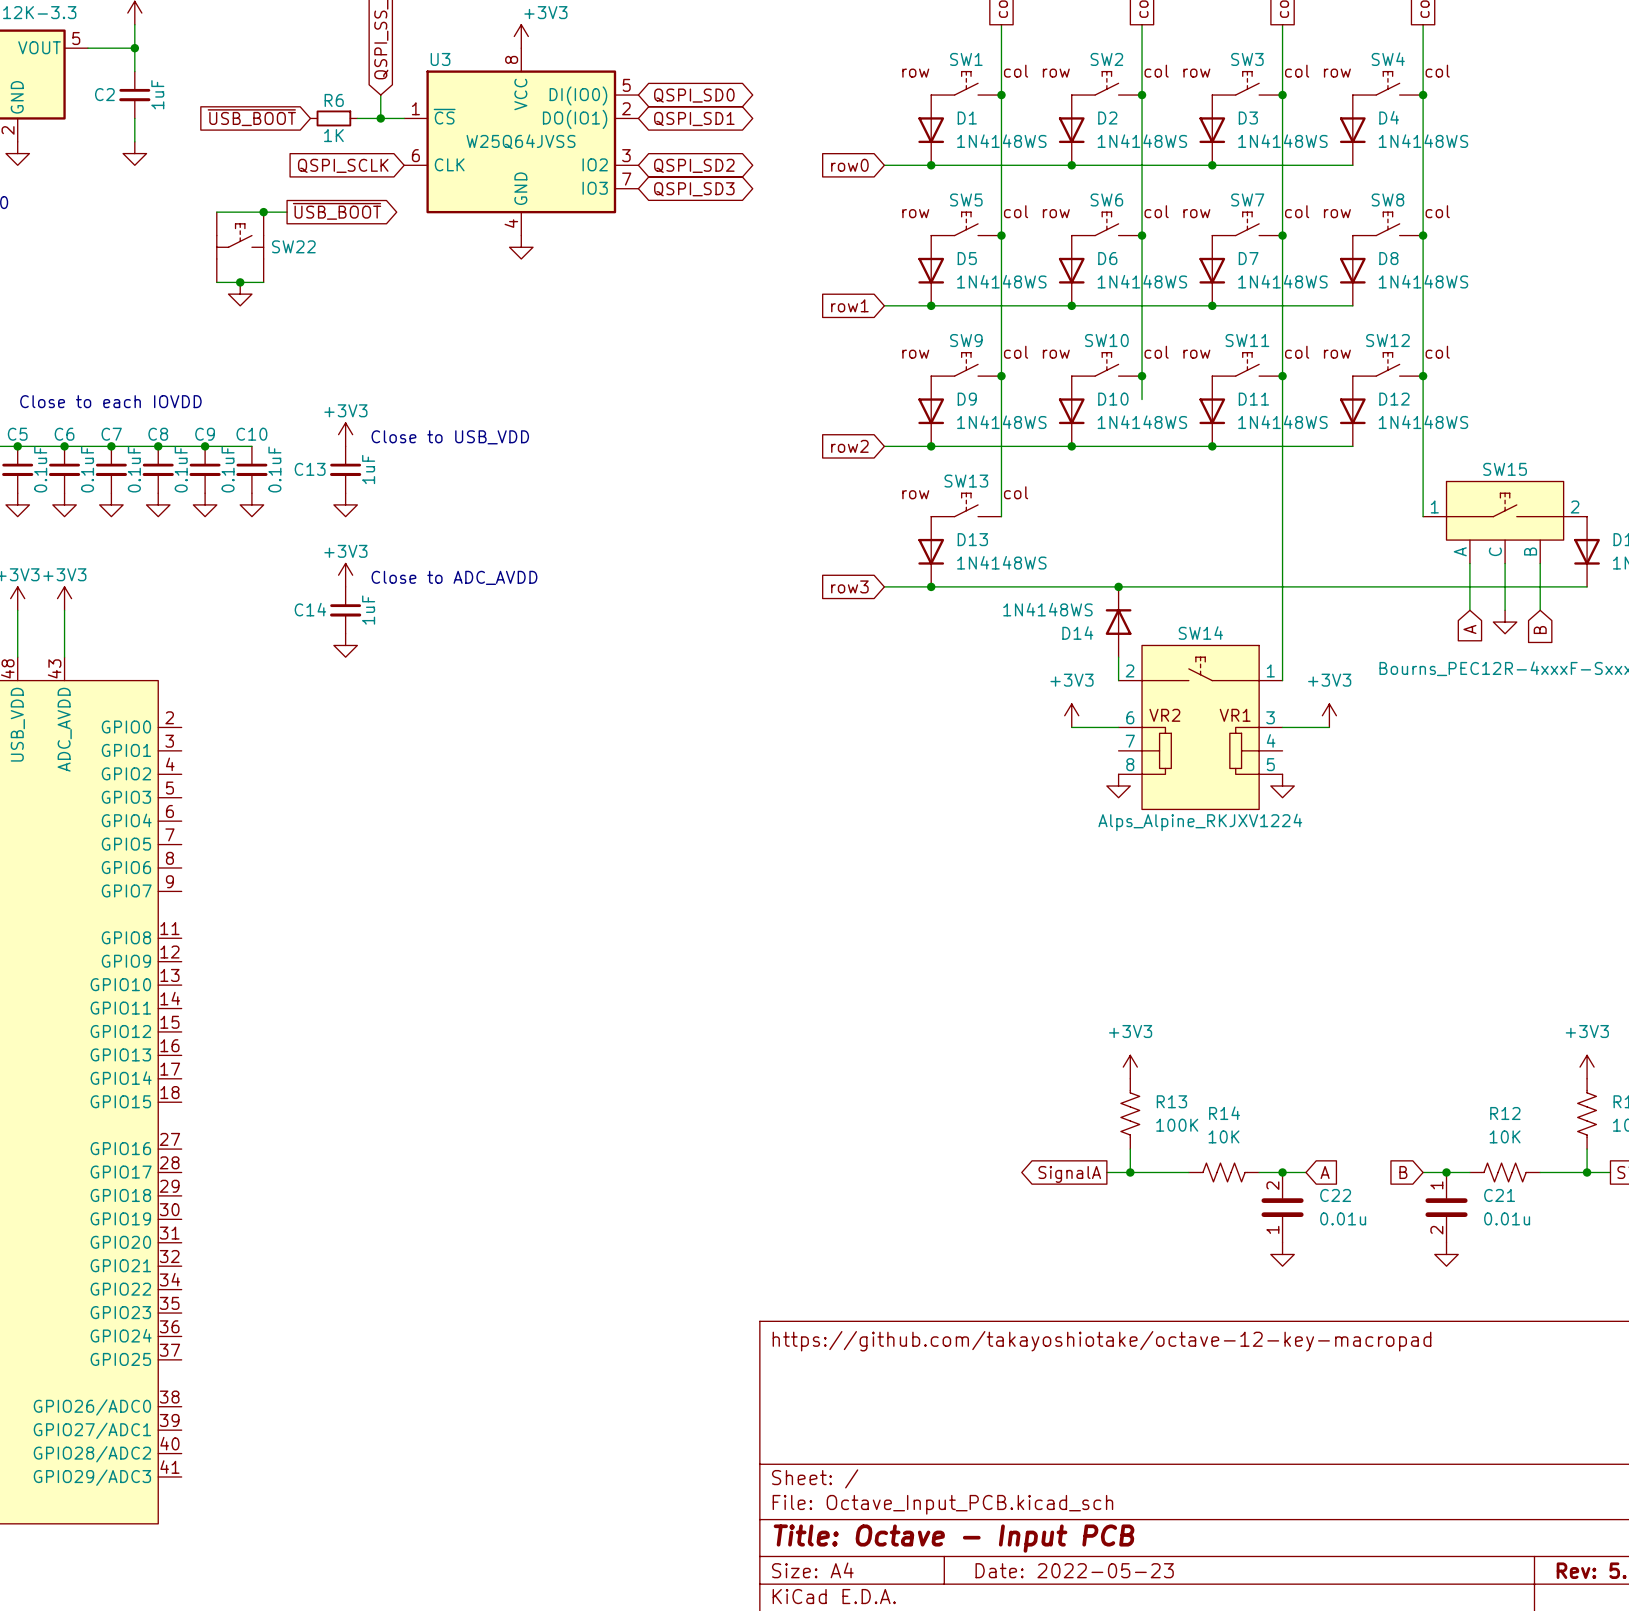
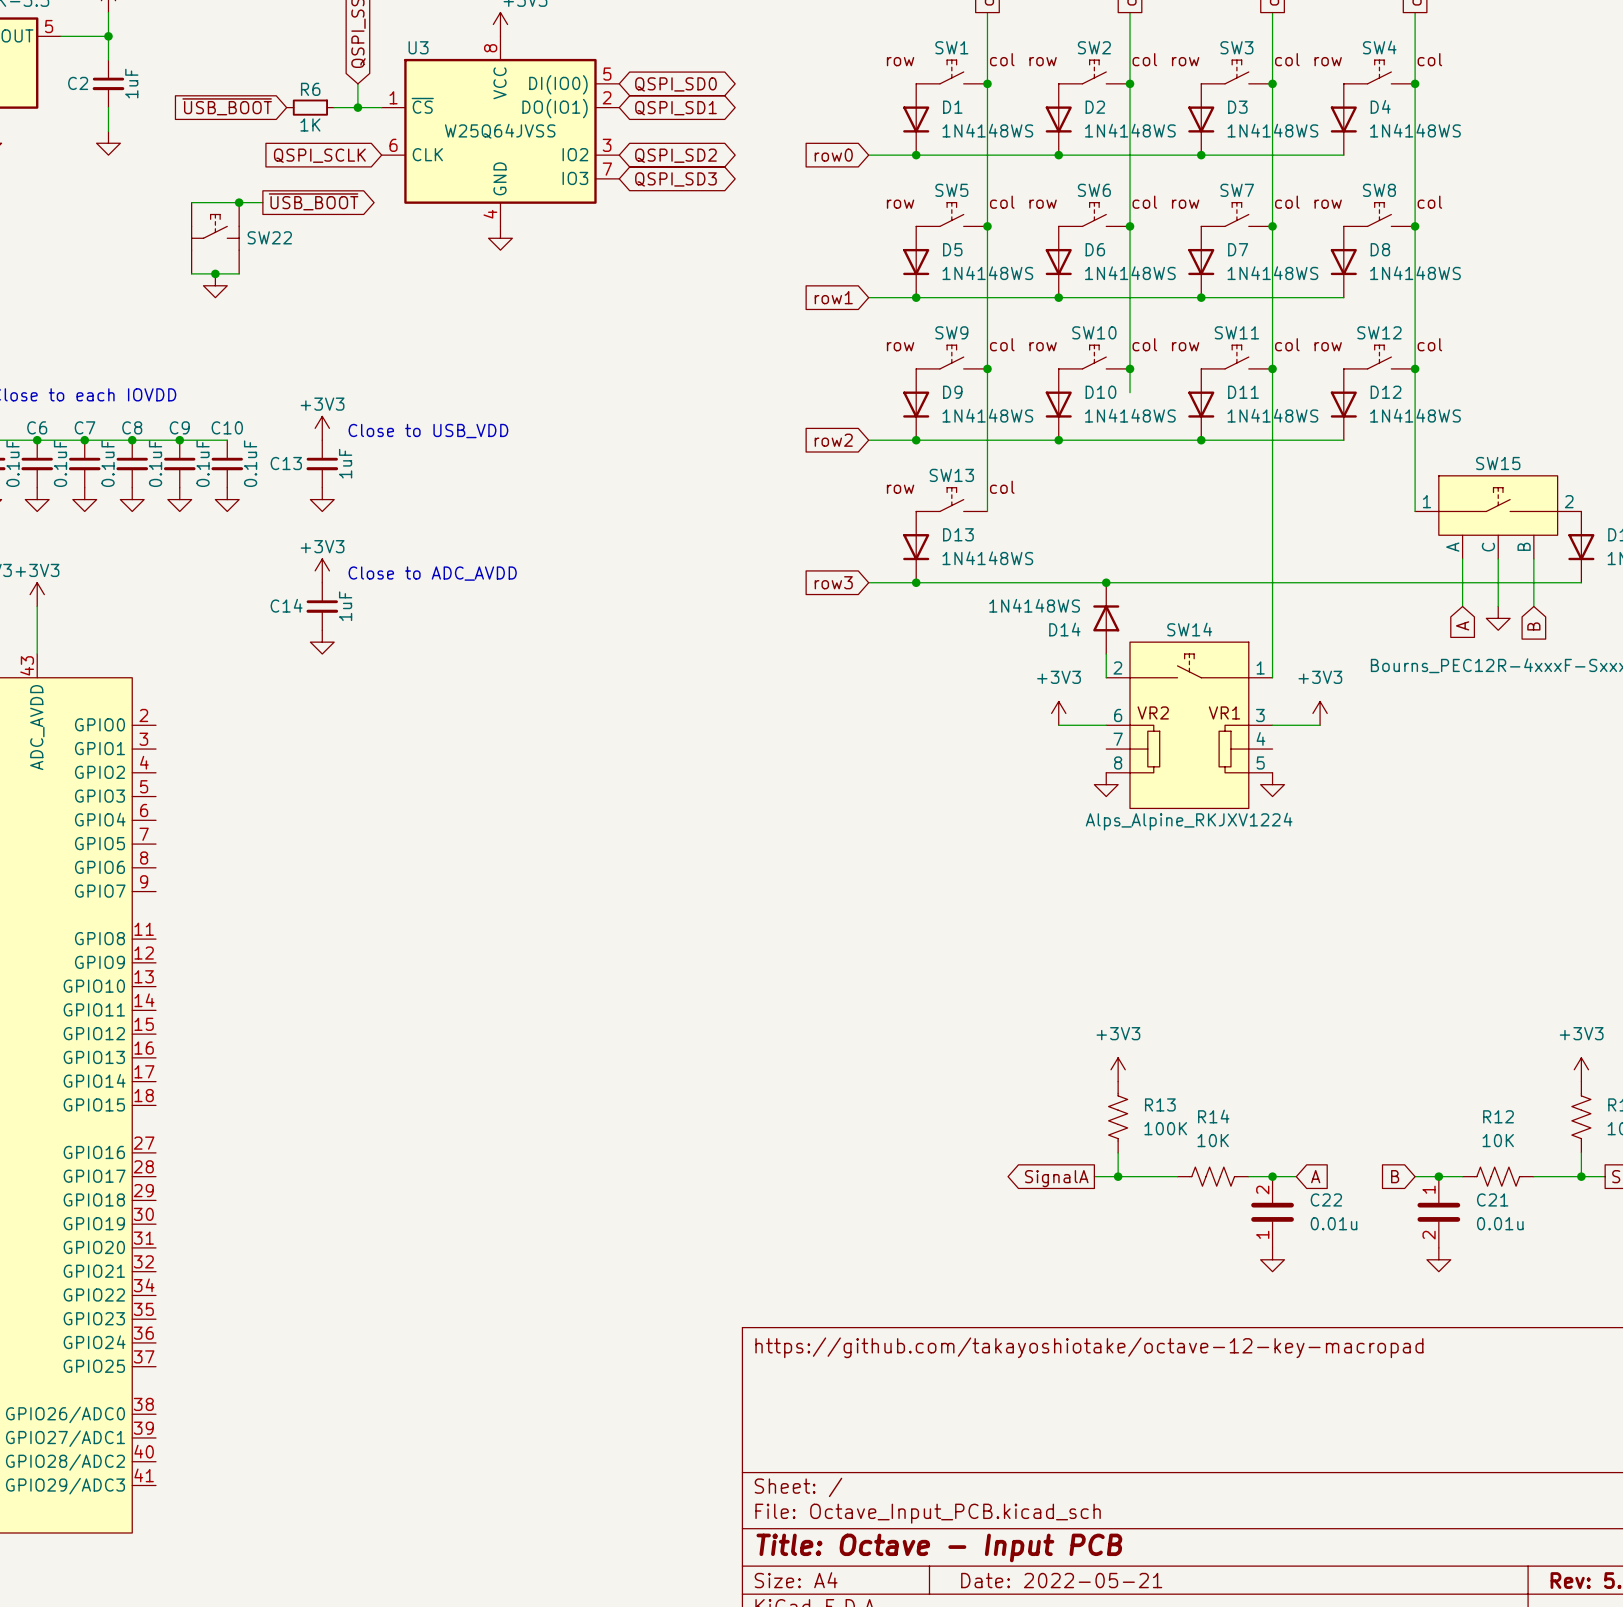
title block: Date: 2022-05-23 (1074, 1570) -> Date: 2022-05-21 (1061, 1580)

